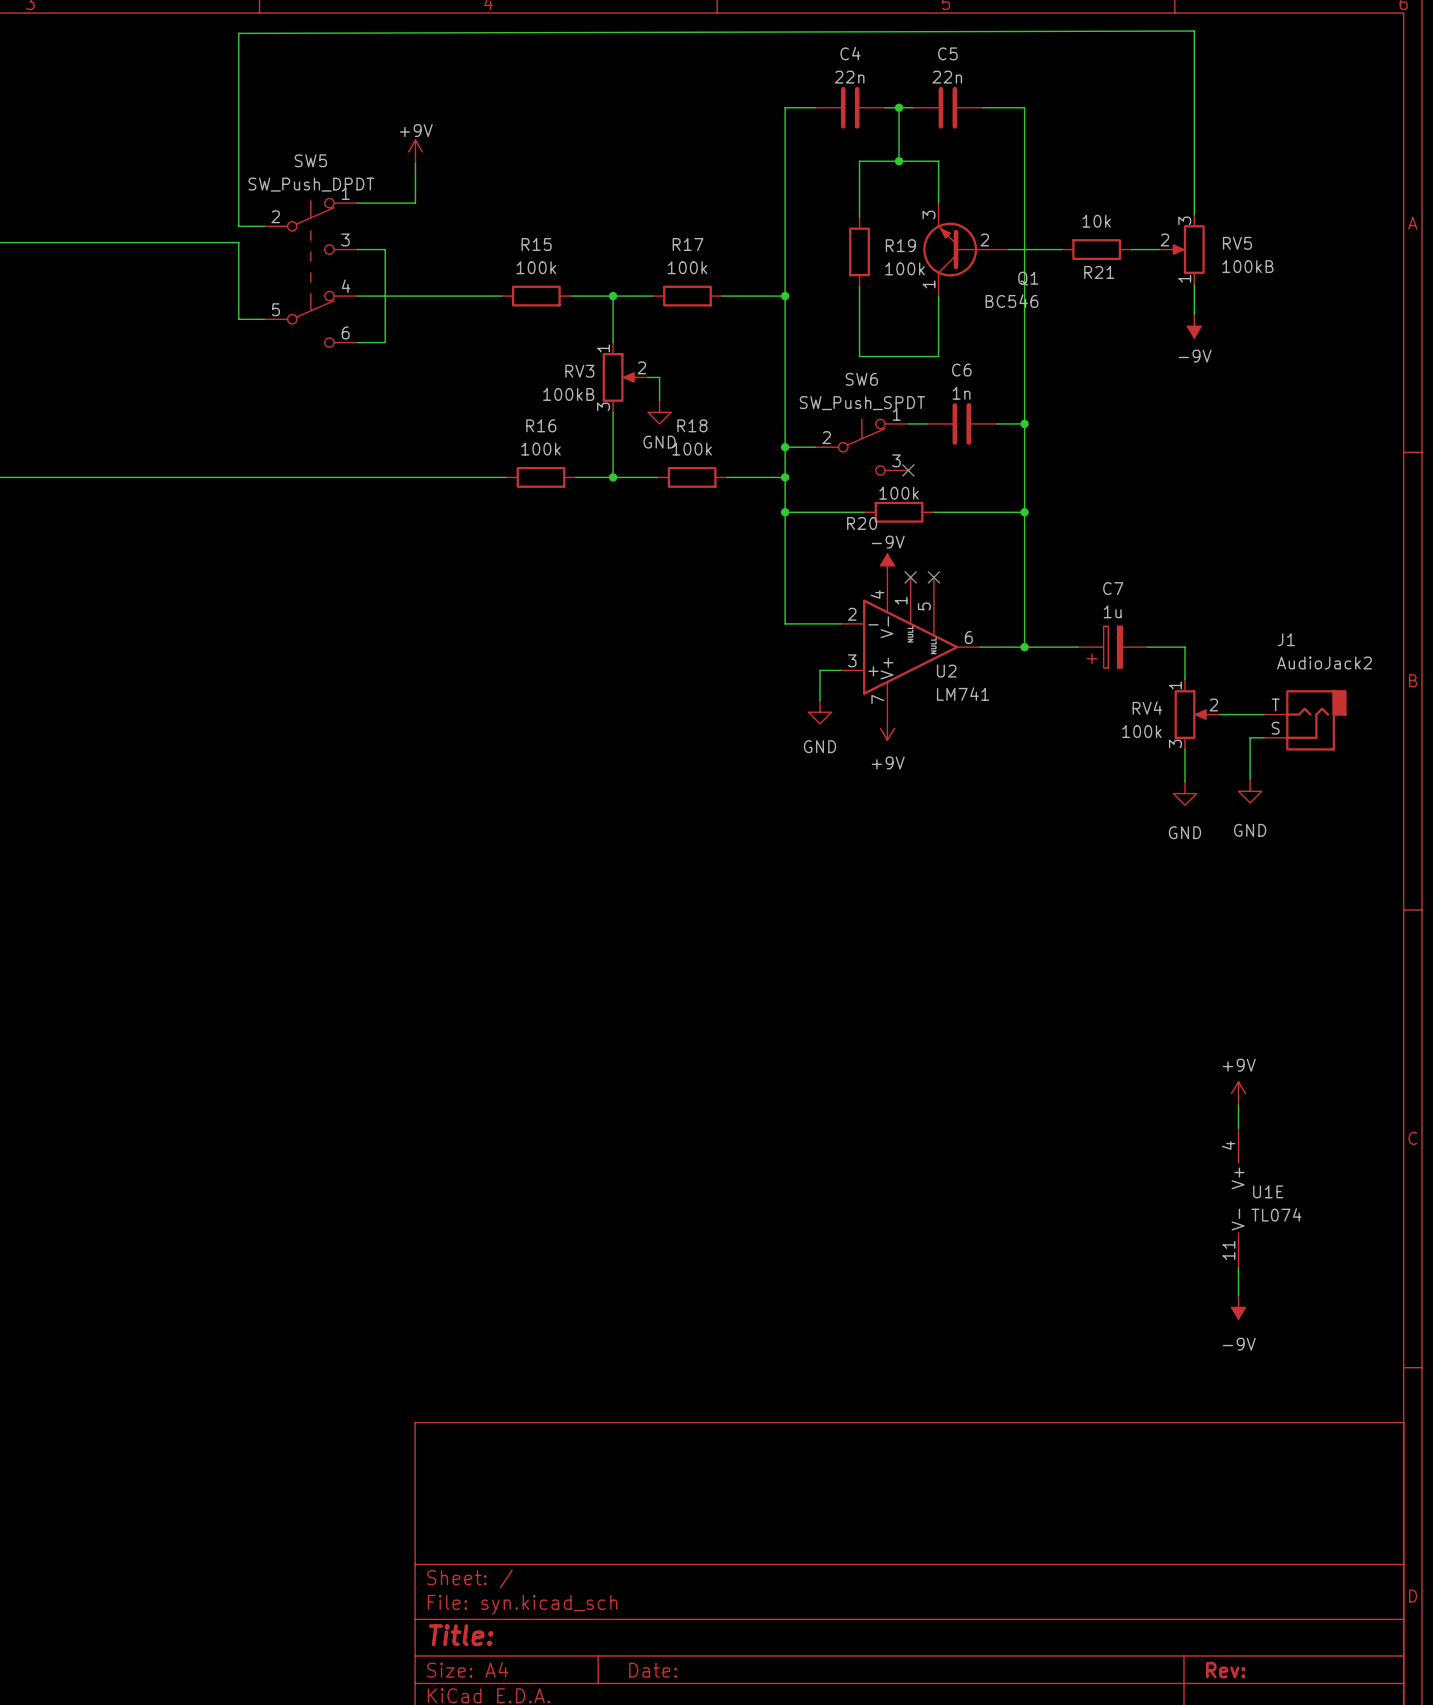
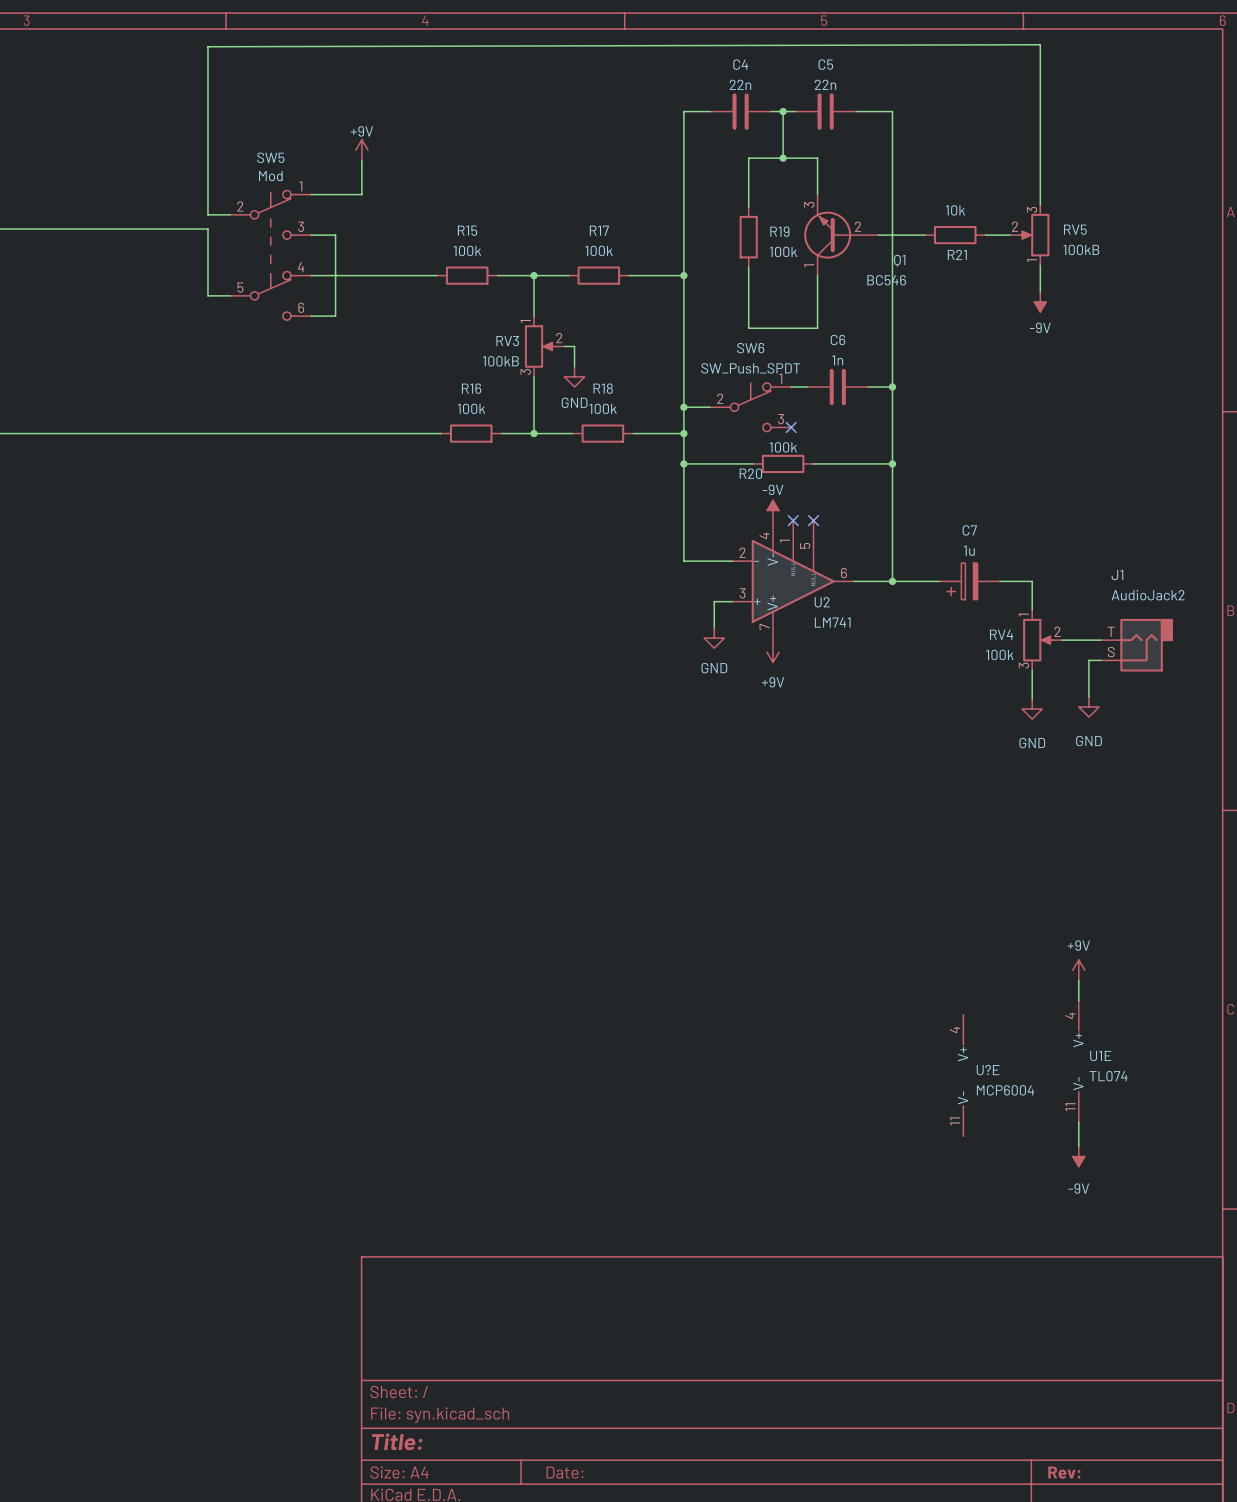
SW5 value: SW_Push_DPDT (311, 184) -> Mod (270, 176)
U?E: none -> MCP6004 (963, 1075)

